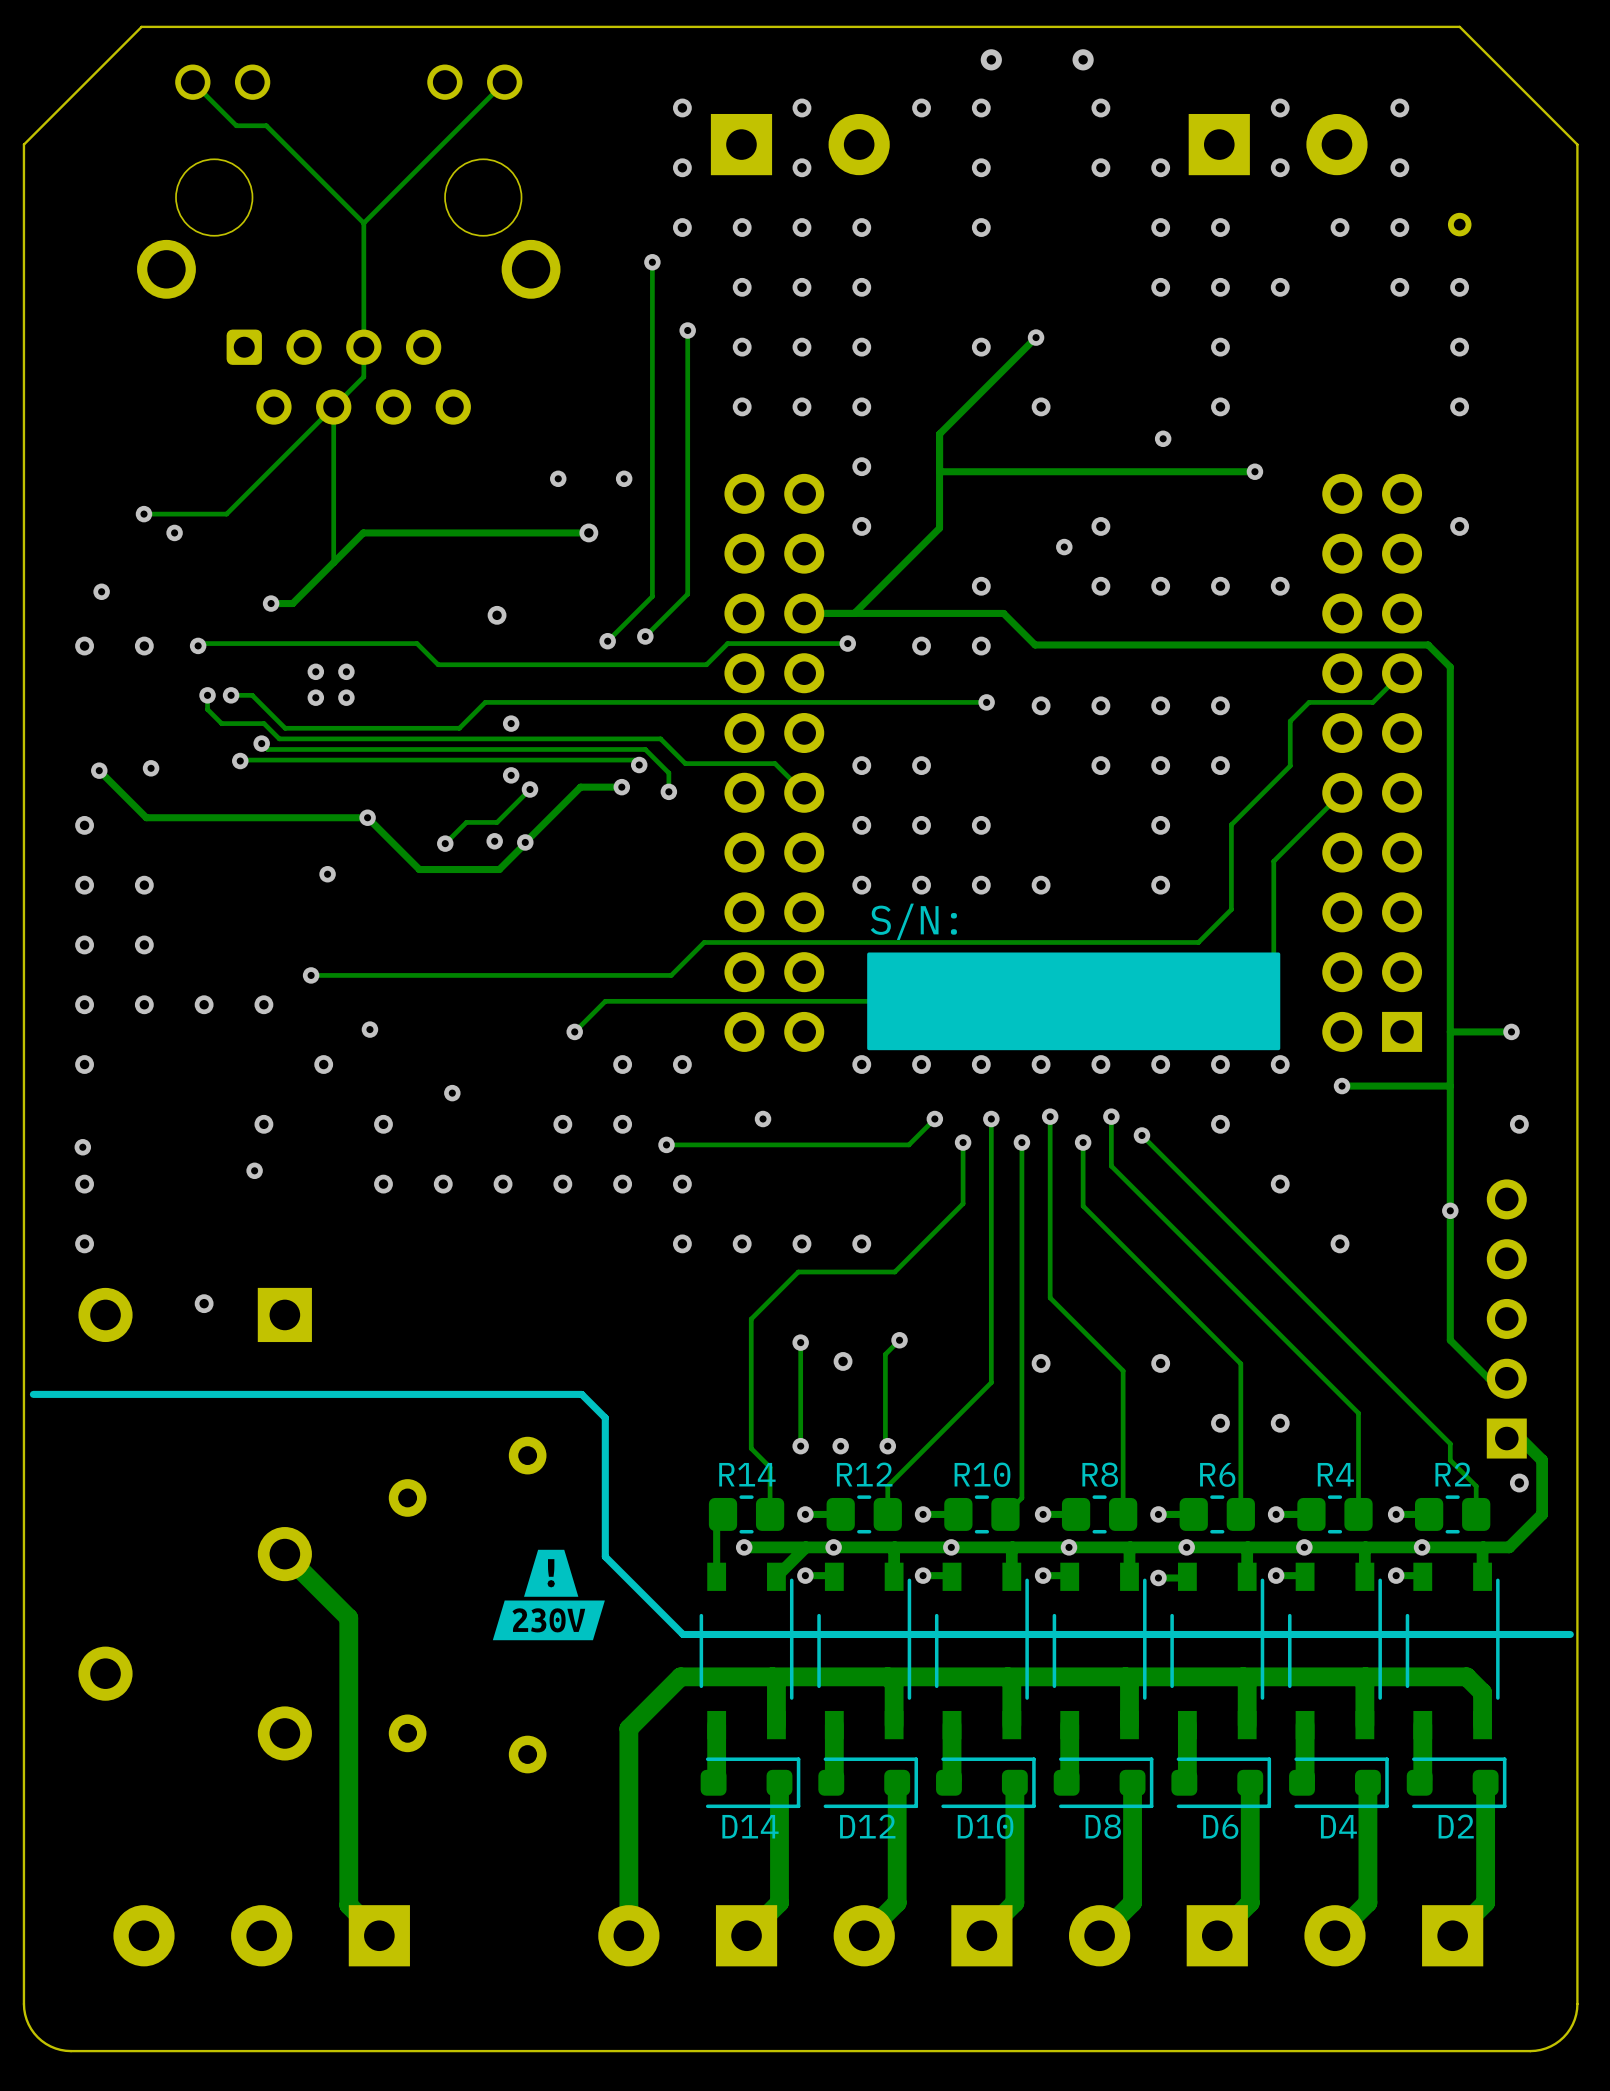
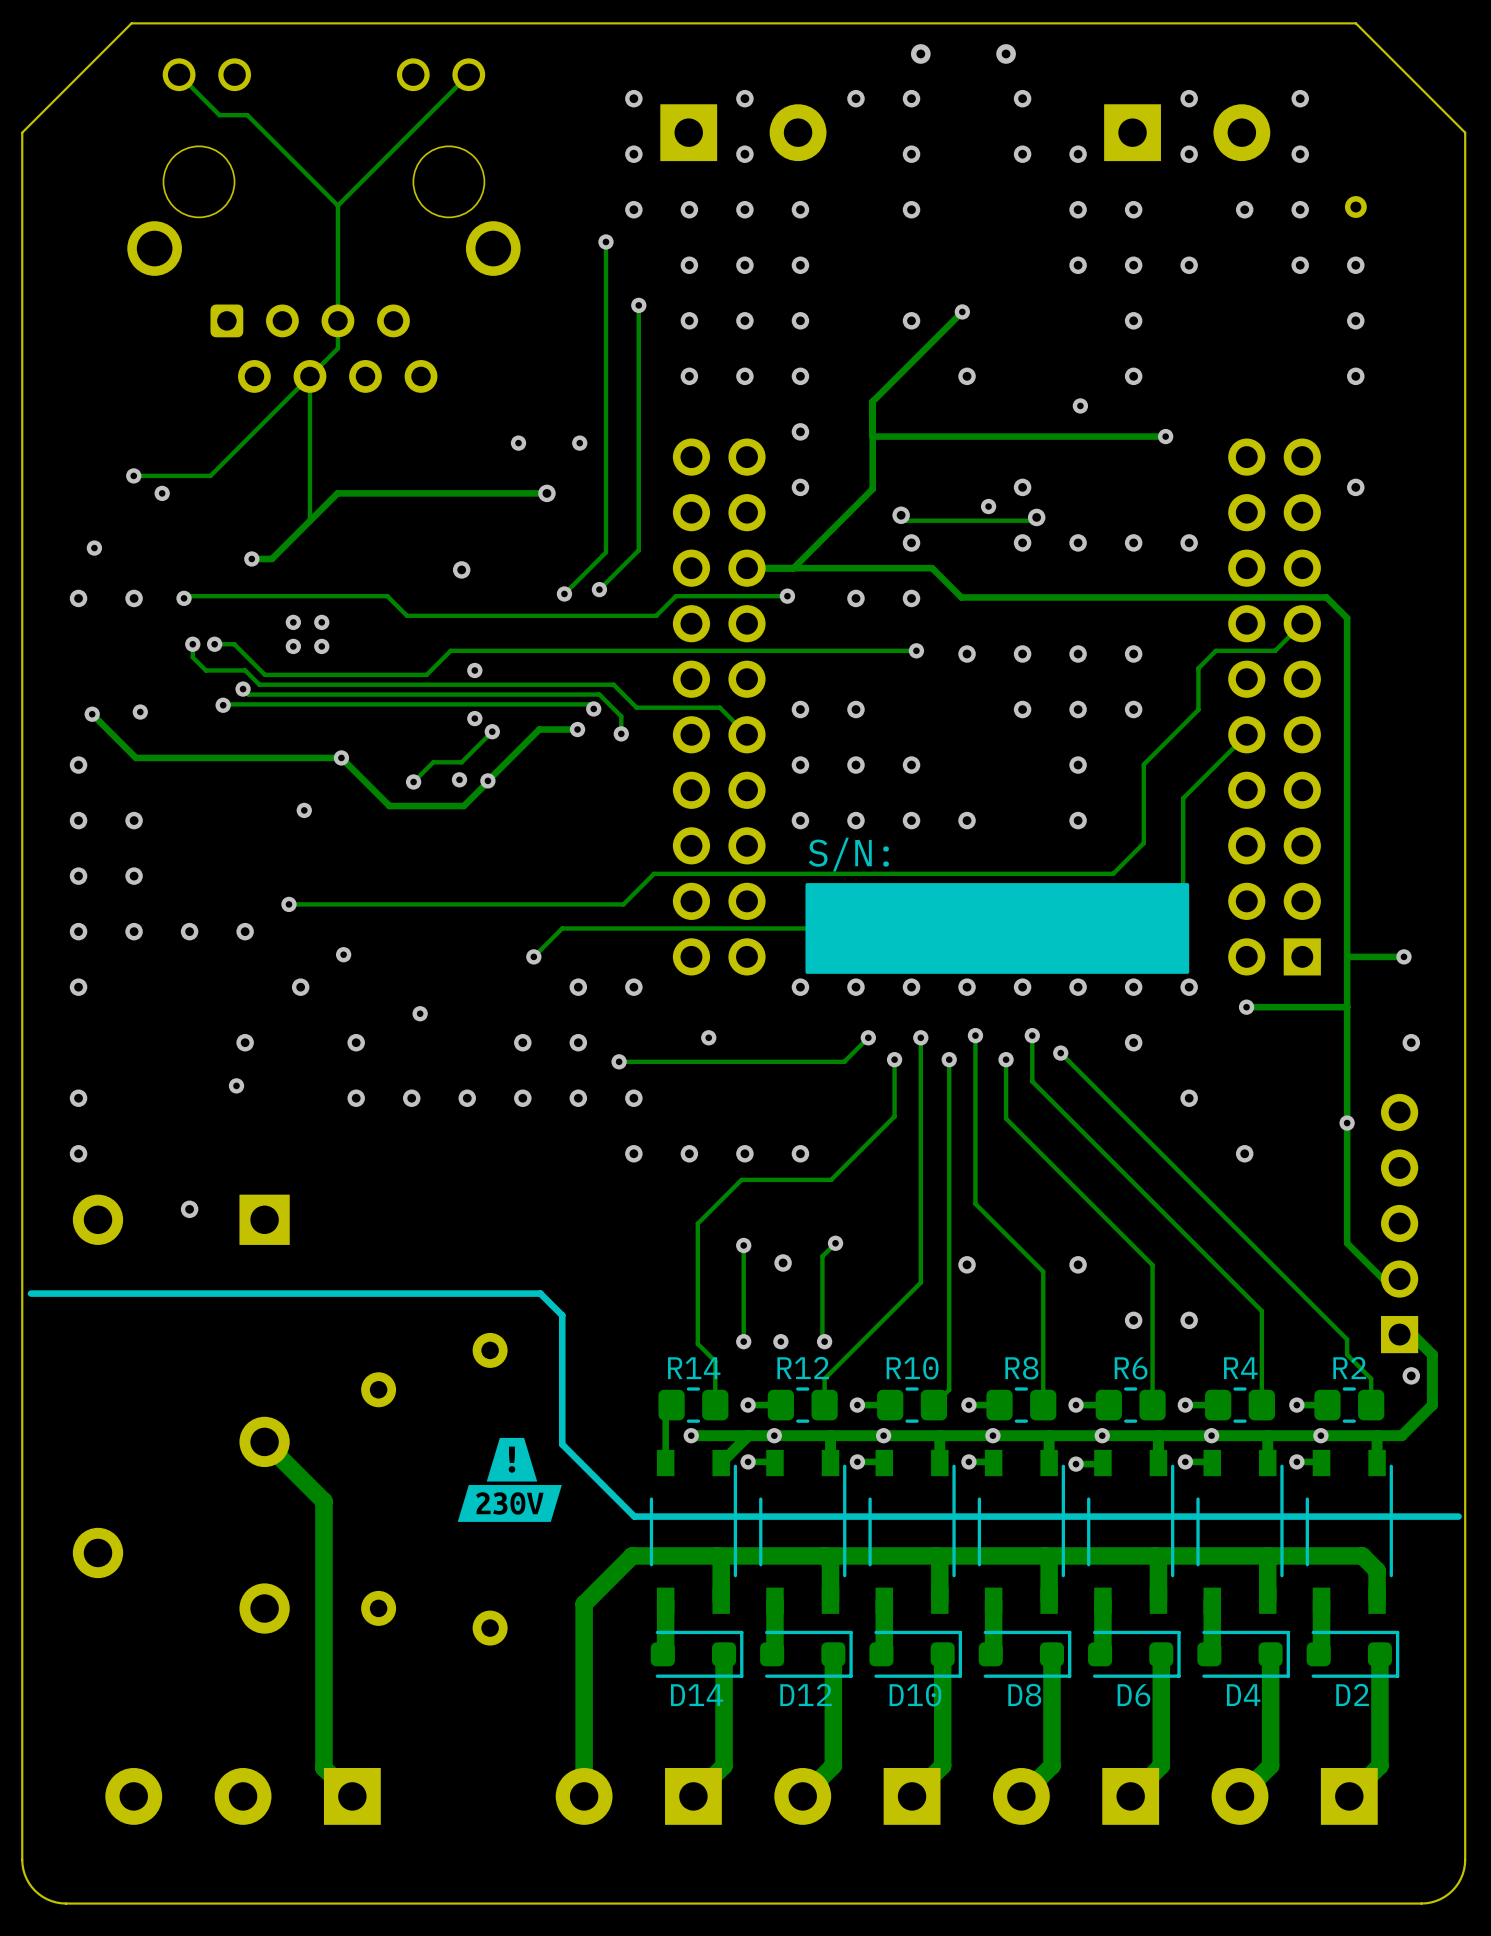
track: none -> (901, 515) (906, 520) (1033, 520) (1036, 517)
via: none -> (901, 515)
via: none -> (1036, 517)
via: (82, 1147) -> none

